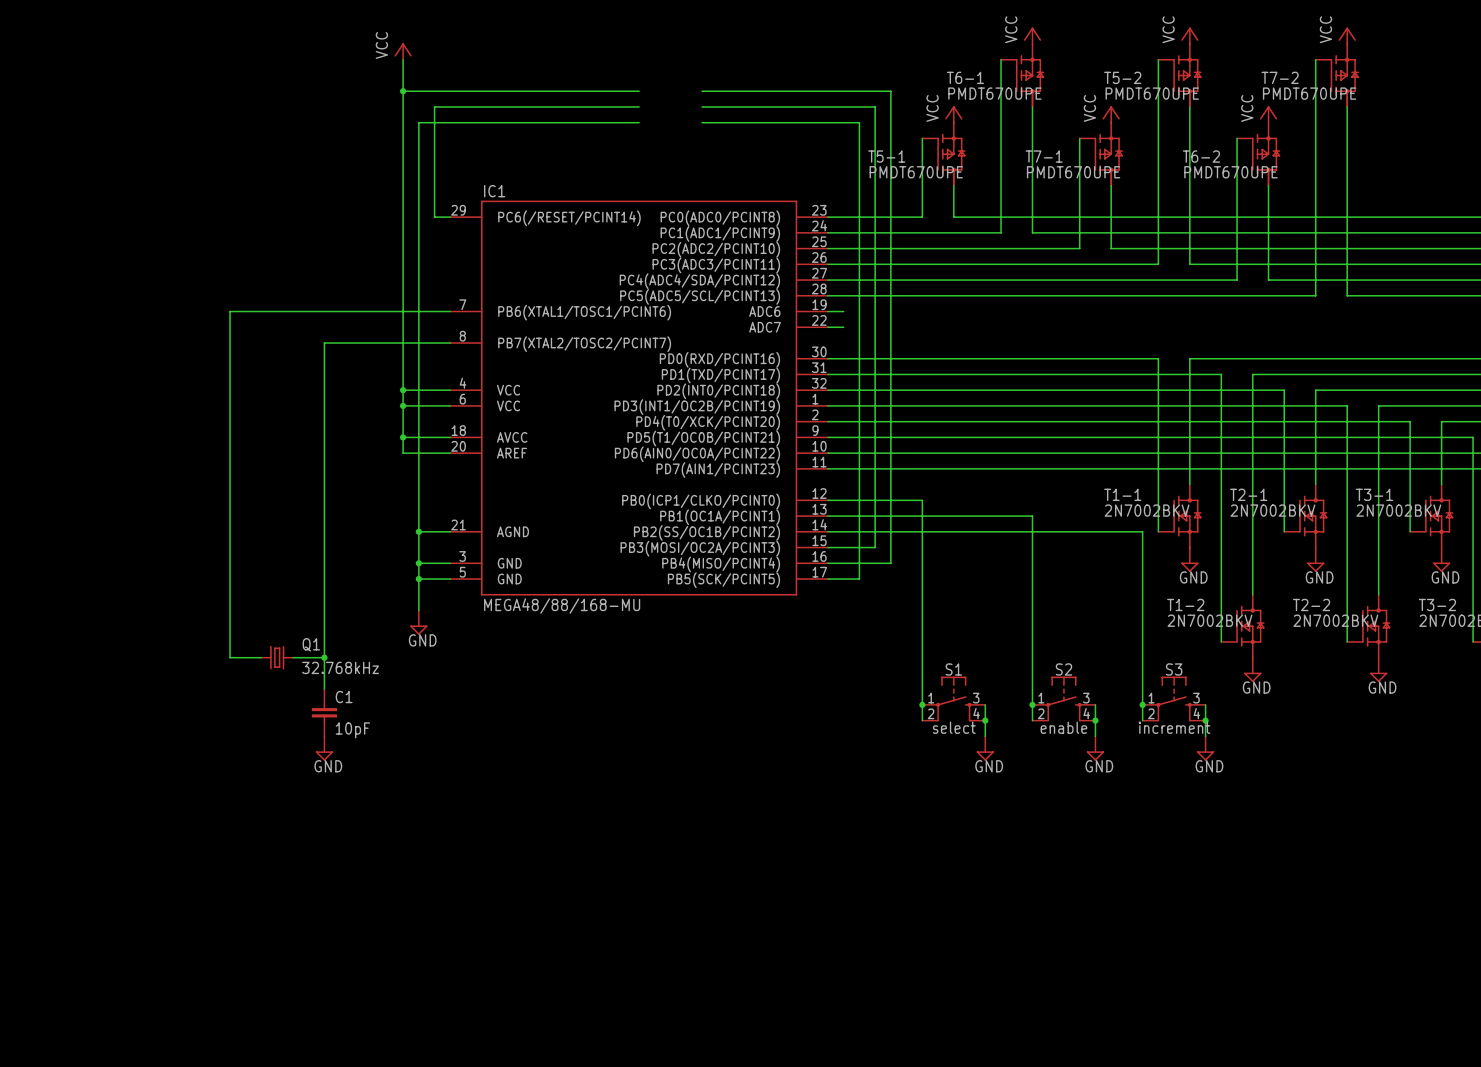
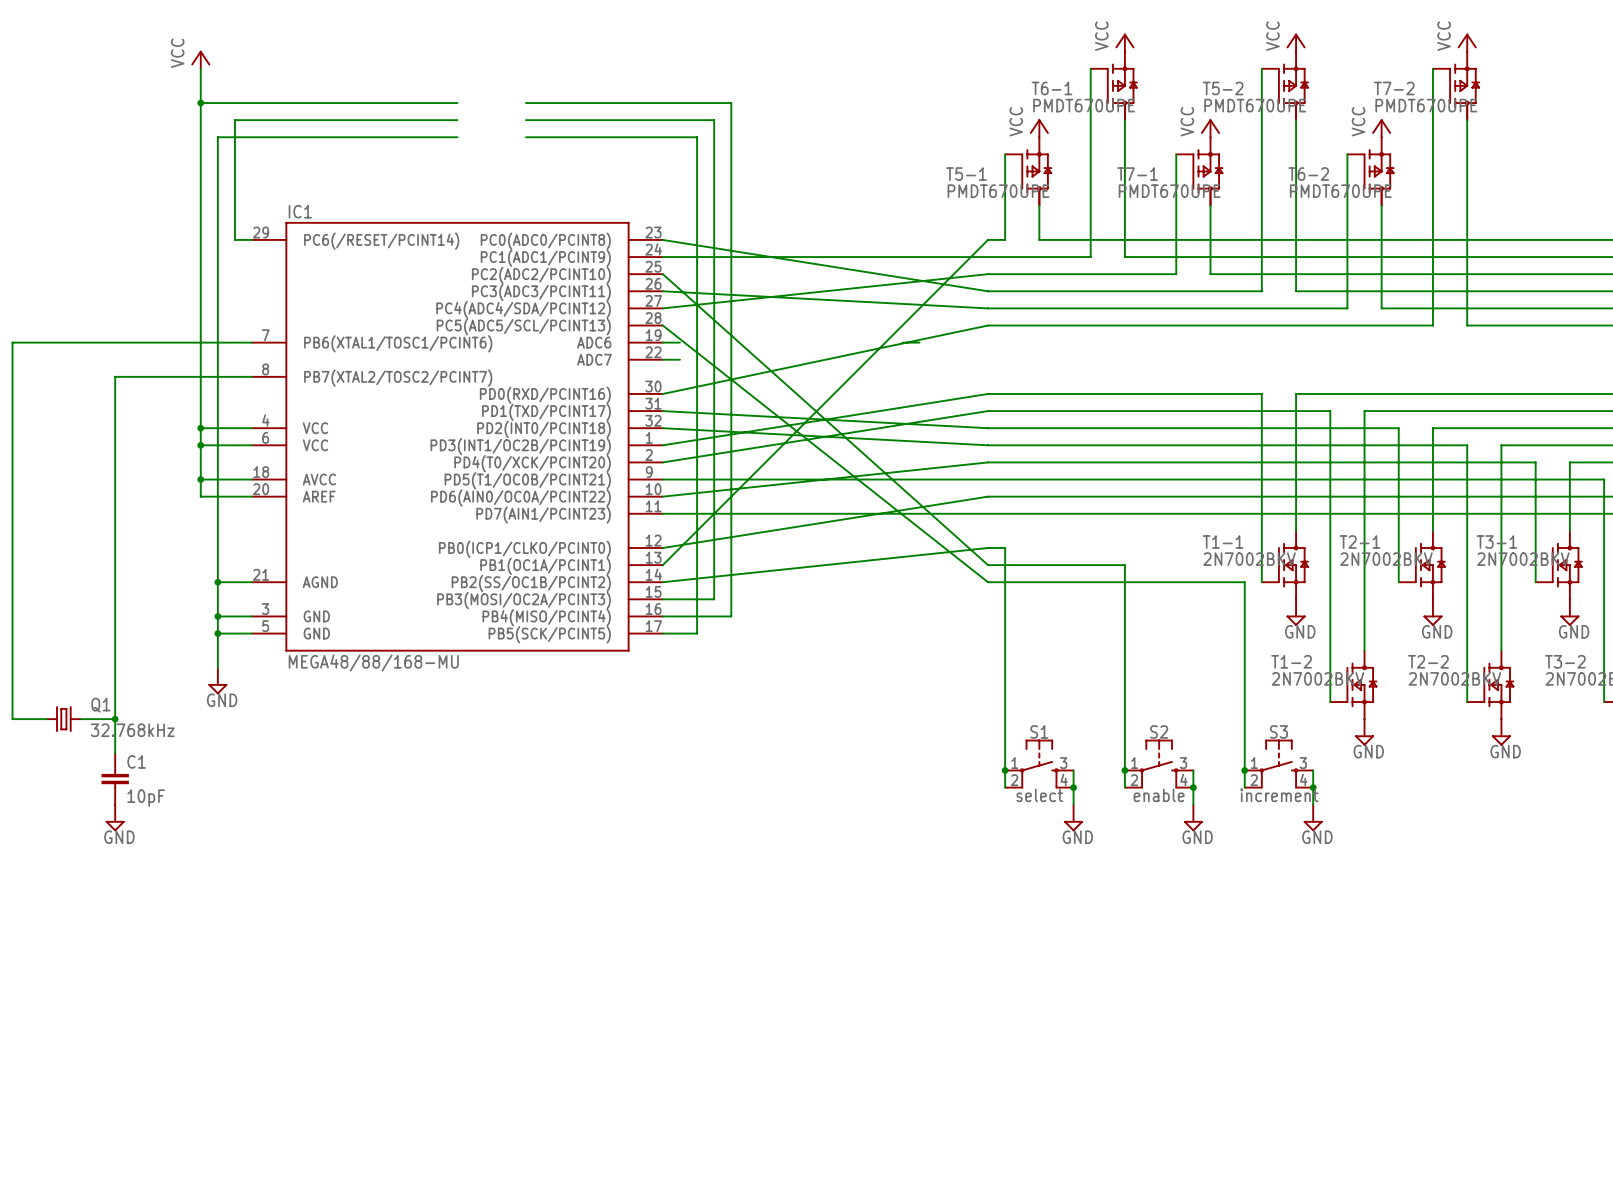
power symbol: none -> VCC (200, 59)
power symbol: VCC (403, 51) -> none
wire: none -> (200, 68) (200, 496) (252, 496)
wire: (403, 59) (403, 453) (450, 453) -> none
wire: none -> (200, 103) (440, 103)
junction: none -> (200, 103)
junction: (403, 91) -> none
wire: (418, 91) (481, 91) -> none
wire: none -> (697, 103) (731, 103) (731, 616) (662, 616)
wire: (702, 91) (890, 91) (890, 563) (827, 563) -> none
wire: none -> (457, 120) (234, 120) (234, 239) (252, 239)
wire: (481, 106) (434, 106) (434, 217) (450, 217) -> none
wire: none -> (697, 120) (714, 120) (714, 599) (662, 599)
wire: (702, 106) (875, 106) (875, 547) (827, 547) -> none
wire: none -> (457, 137) (217, 137) (217, 667)
wire: (481, 122) (418, 122) (418, 610) -> none
wire: none -> (697, 137) (697, 633) (662, 633)
wire: (702, 122) (859, 122) (859, 579) (827, 579) -> none
wire: (827, 217) (906, 217) -> (662, 565) (988, 239)
wire: none -> (662, 257) (902, 257)
wire: (827, 248) (906, 248) -> (662, 308) (988, 274)
wire: (827, 264) (906, 264) -> (662, 239) (988, 291)
wire: (827, 280) (906, 280) -> (662, 291) (988, 308)
wire: (827, 295) (906, 295) -> (662, 393) (988, 325)
wire: none -> (252, 342) (12, 342) (12, 719) (46, 719)
wire: (450, 311) (230, 311) (230, 657) (261, 657) -> none
wire: none -> (662, 342) (679, 342)
wire: none -> (662, 359) (679, 359)
wire: (827, 327) (843, 327) -> none
wire: none -> (252, 376) (115, 376) (115, 753)
wire: (450, 342) (324, 342) (324, 689) -> none
wire: (827, 358) (906, 358) -> (662, 445) (988, 393)
wire: (827, 374) (906, 374) -> (662, 462) (988, 411)
wire: none -> (200, 428) (252, 428)
junction: none -> (200, 428)
wire: (403, 390) (450, 390) -> none
junction: (403, 390) -> none
wire: (827, 390) (906, 390) -> (662, 411) (988, 428)
IC1 position: (639, 398) -> (457, 436)
wire: none -> (200, 445) (252, 445)
junction: none -> (200, 445)
wire: (403, 405) (450, 405) -> none
junction: (403, 405) -> none
wire: (827, 405) (906, 405) -> (662, 428) (988, 445)
wire: (827, 421) (906, 421) -> (662, 496) (988, 462)
wire: none -> (200, 479) (252, 479)
junction: none -> (200, 479)
wire: (403, 437) (450, 437) -> none
junction: (403, 437) -> none
wire: none -> (662, 479) (902, 479)
wire: (827, 453) (906, 453) -> (662, 547) (988, 496)
wire: none -> (662, 513) (902, 513)
wire: (827, 500) (906, 500) -> (662, 582) (988, 547)
wire: (827, 516) (906, 516) -> (662, 274) (988, 565)
wire: none -> (217, 582) (252, 582)
junction: none -> (217, 582)
wire: (418, 531) (450, 531) -> none
junction: (418, 531) -> none
wire: (827, 531) (906, 531) -> (662, 325) (988, 582)
wire: none -> (217, 616) (252, 616)
junction: none -> (217, 616)
wire: (418, 563) (450, 563) -> none
junction: (418, 563) -> none
junction: none -> (217, 633)
wire: (418, 579) (450, 579) -> none
junction: (418, 579) -> none
power symbol: none -> GND (217, 681)
power symbol: GND (418, 622) -> none
wire: none -> (80, 719) (115, 719)
junction: none -> (115, 719)
Q1 position: (277, 657) -> (63, 719)
wire: (292, 657) (324, 657) -> (217, 633) (252, 633)
junction: (324, 657) -> none
C1 position: (324, 712) -> (115, 779)
power symbol: none -> GND (115, 817)
power symbol: GND (324, 748) -> none

